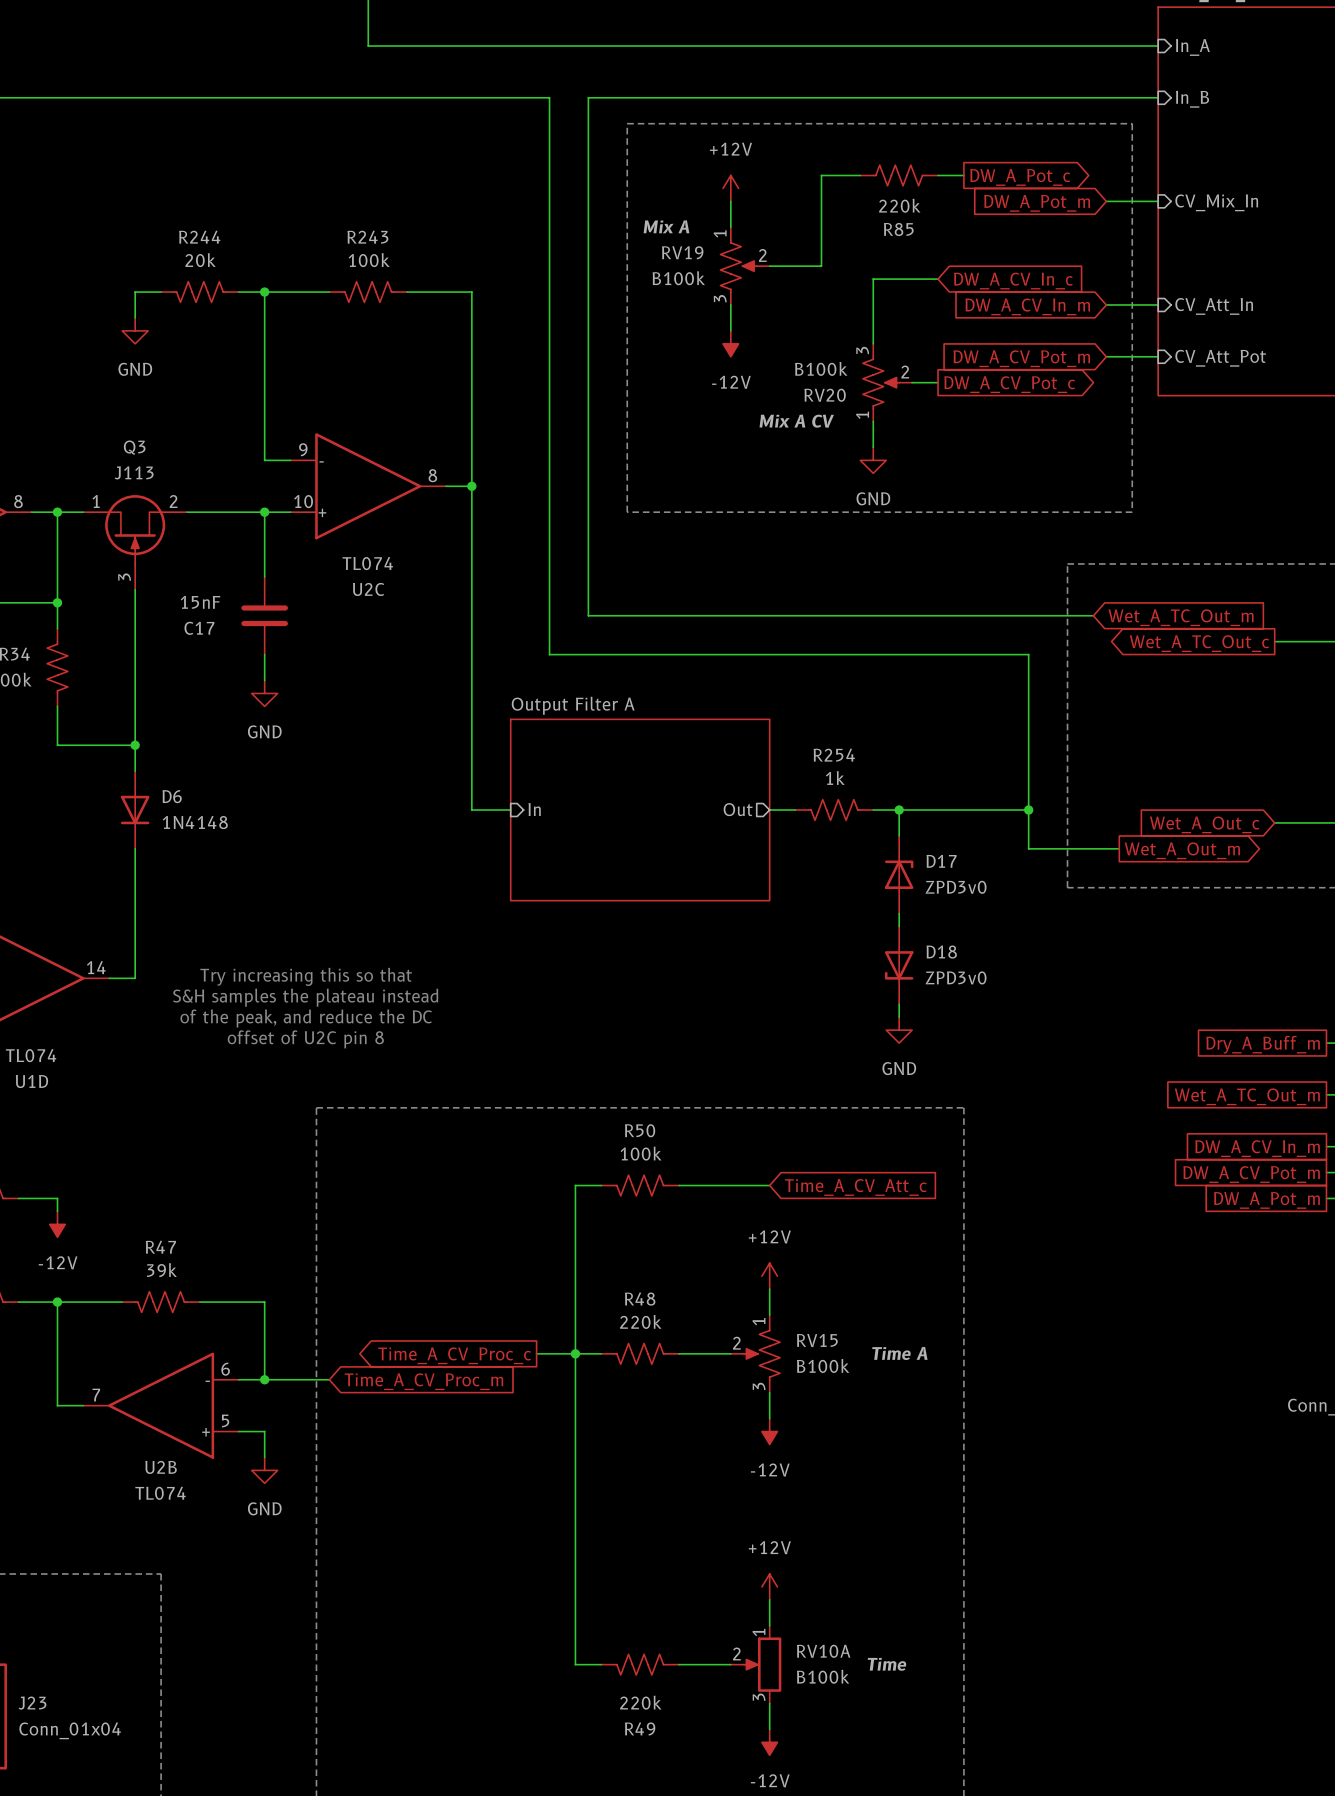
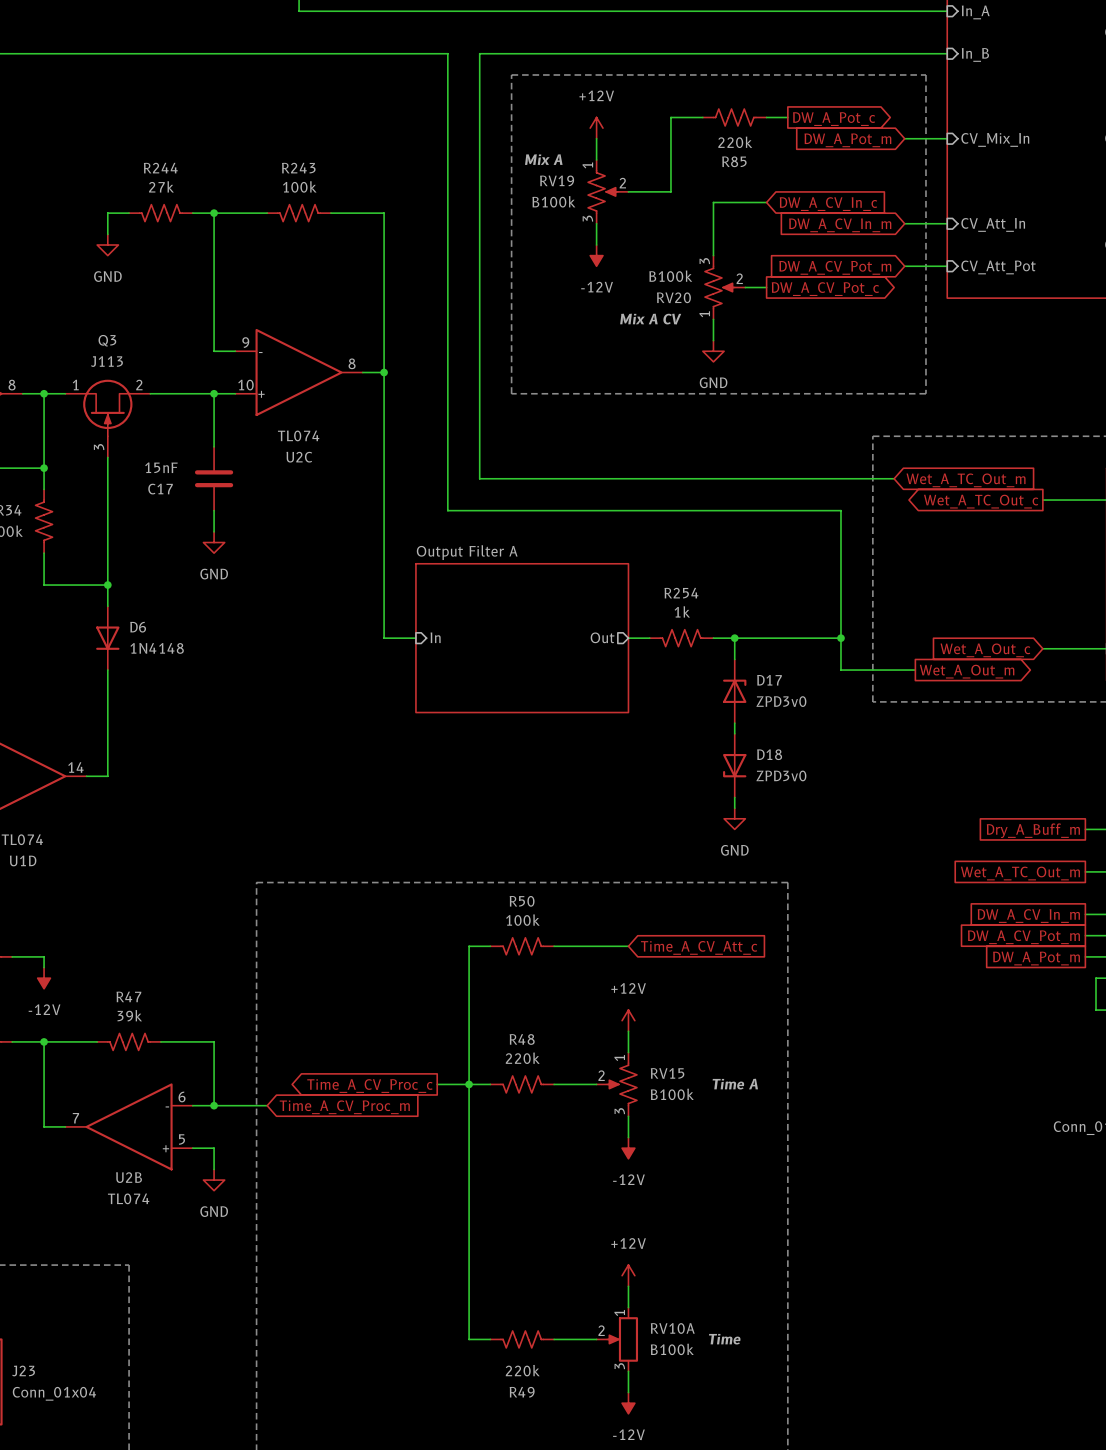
R244 value: 20k (200, 260) -> 27k (161, 186)
text: Try increasing this so that (306, 976) -> none
text: S&H samples the plateau instead (305, 997) -> none
text: of the peak, and reduce the DC (306, 1018) -> none
text: offset of U2C pin 8 (305, 1039) -> none

